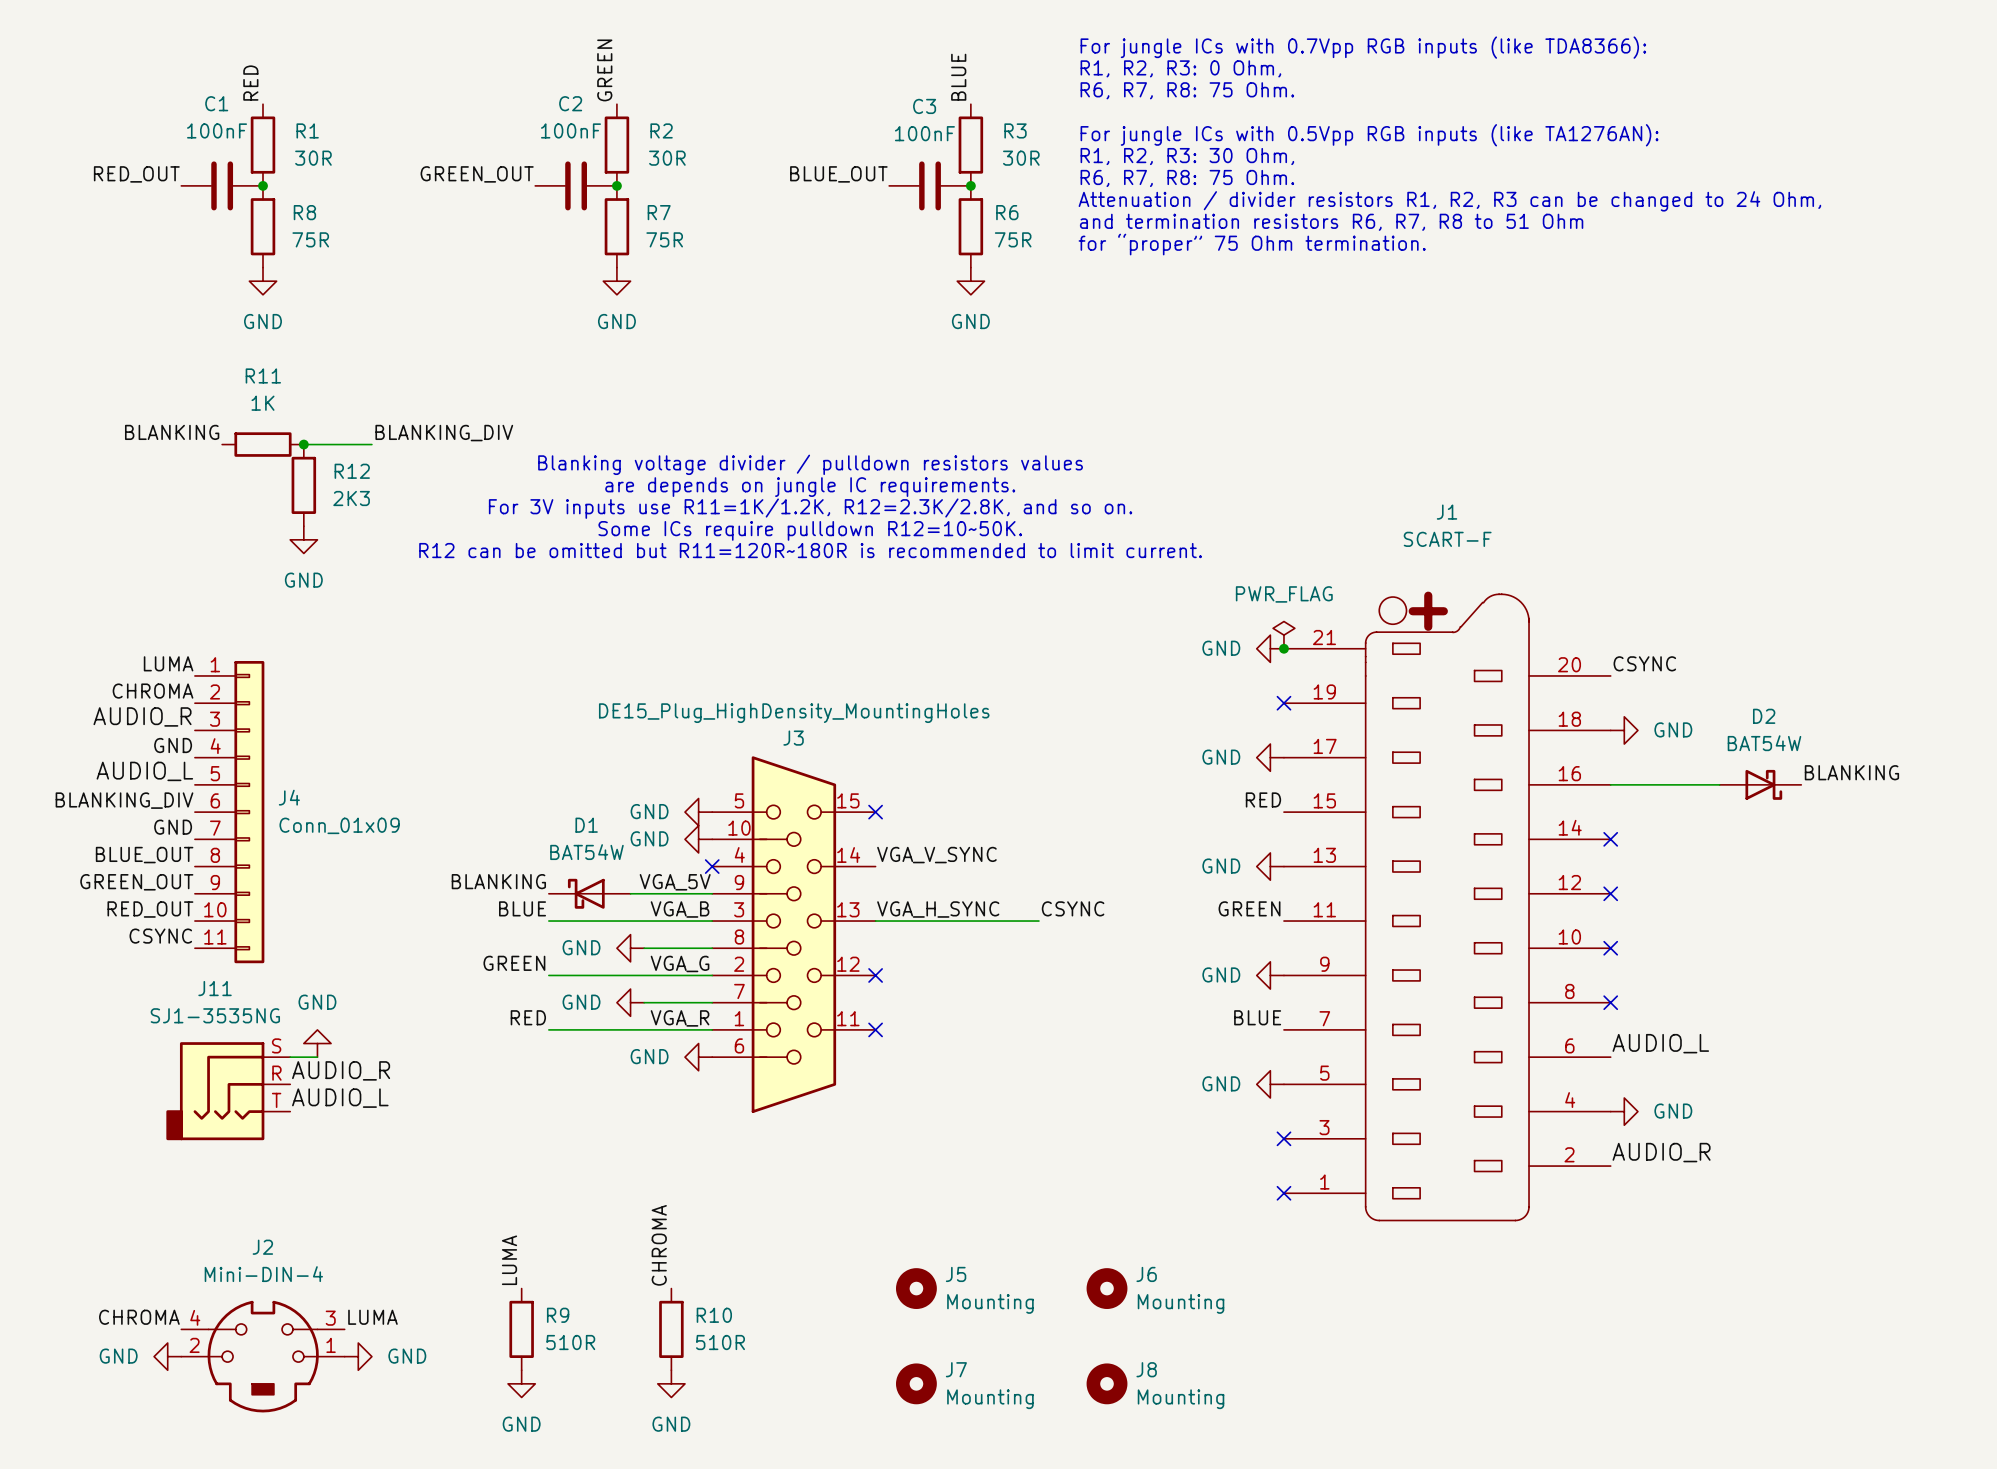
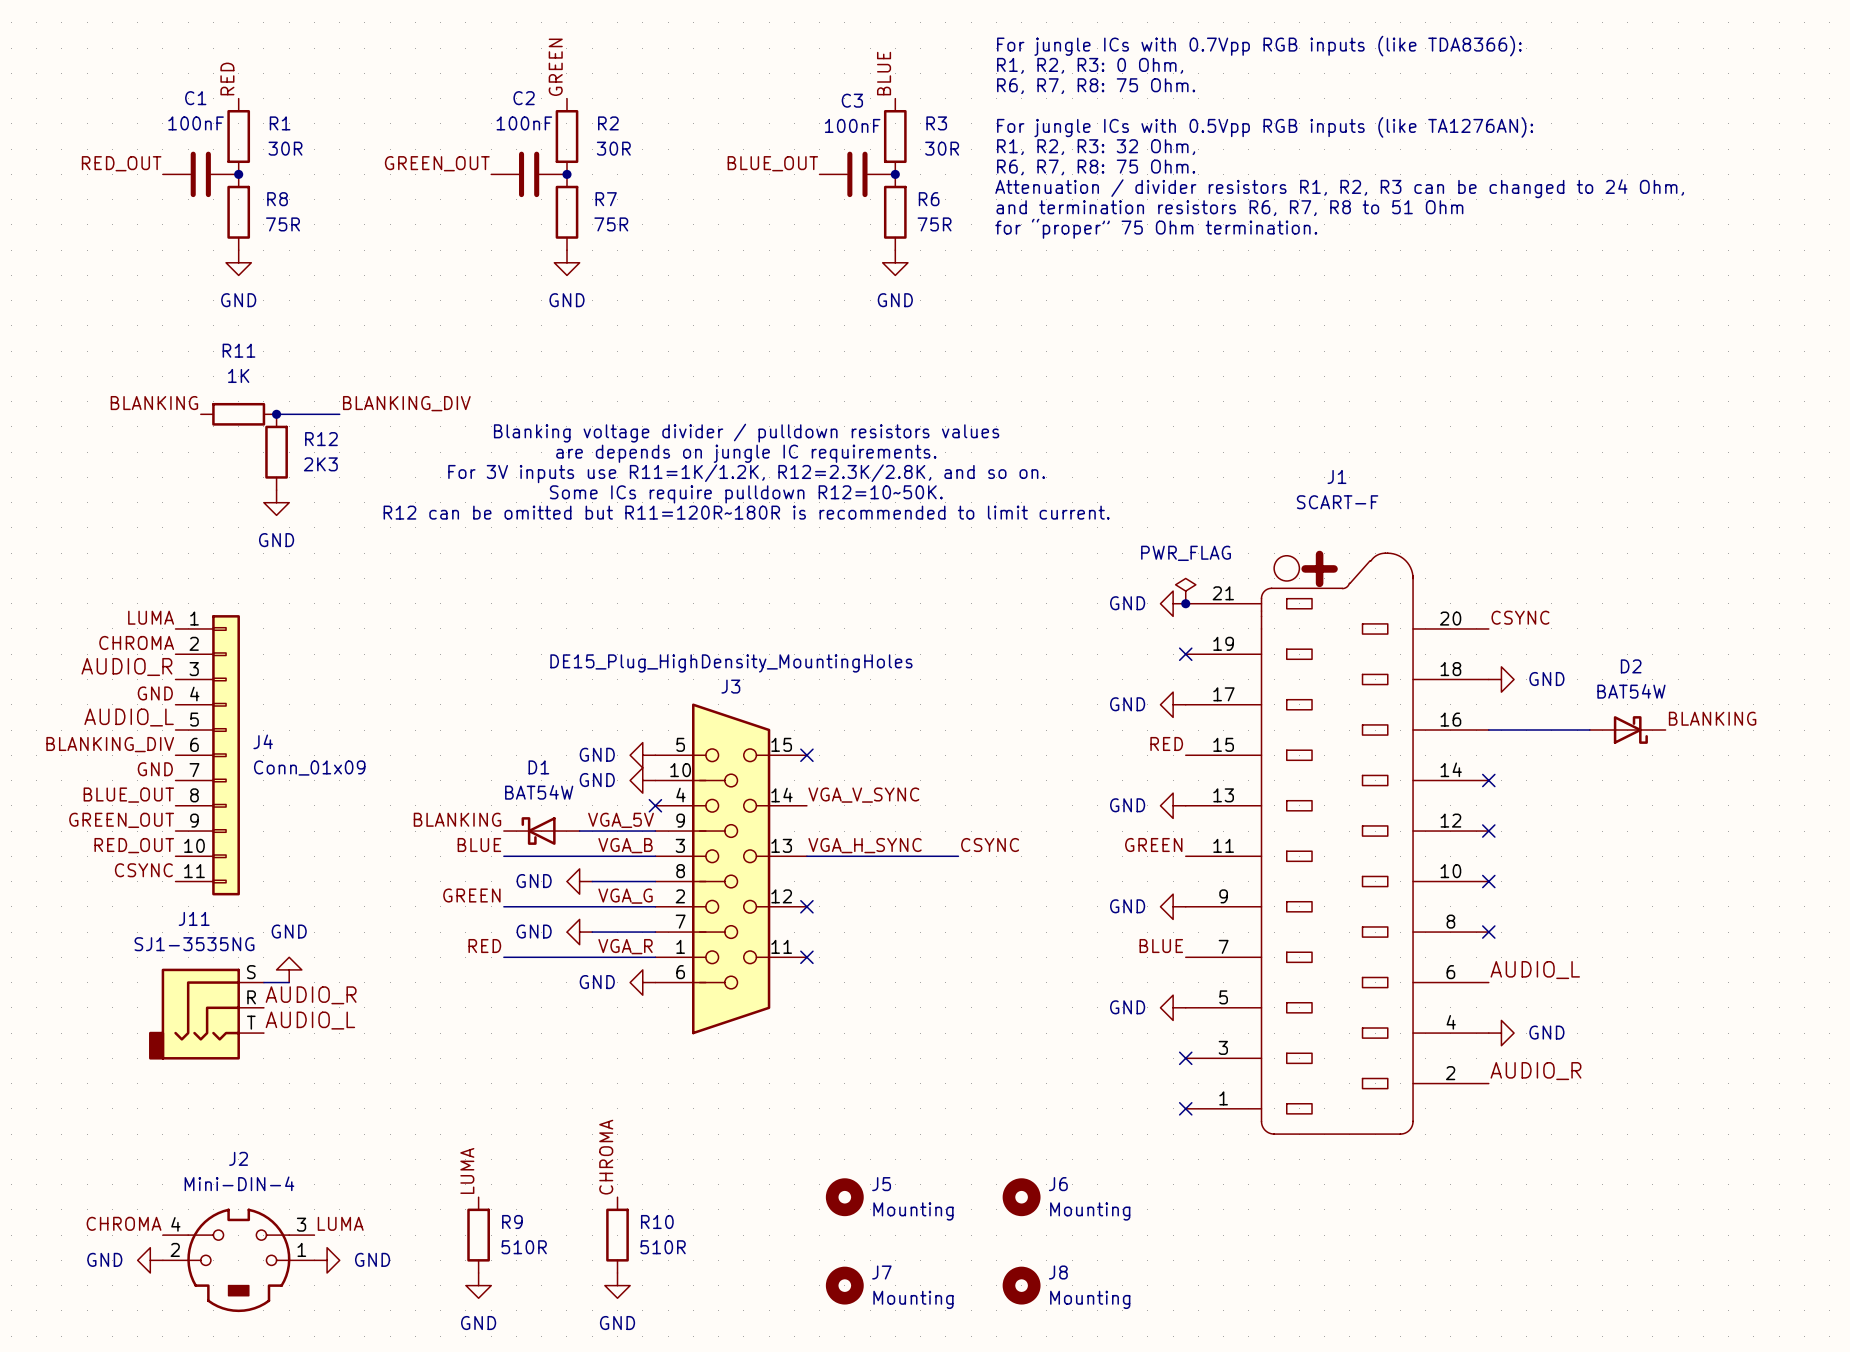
text: R1, R2, R3: 30 Ohm, (1187, 156) -> R1, R2, R3: 32 Ohm, (1096, 147)

